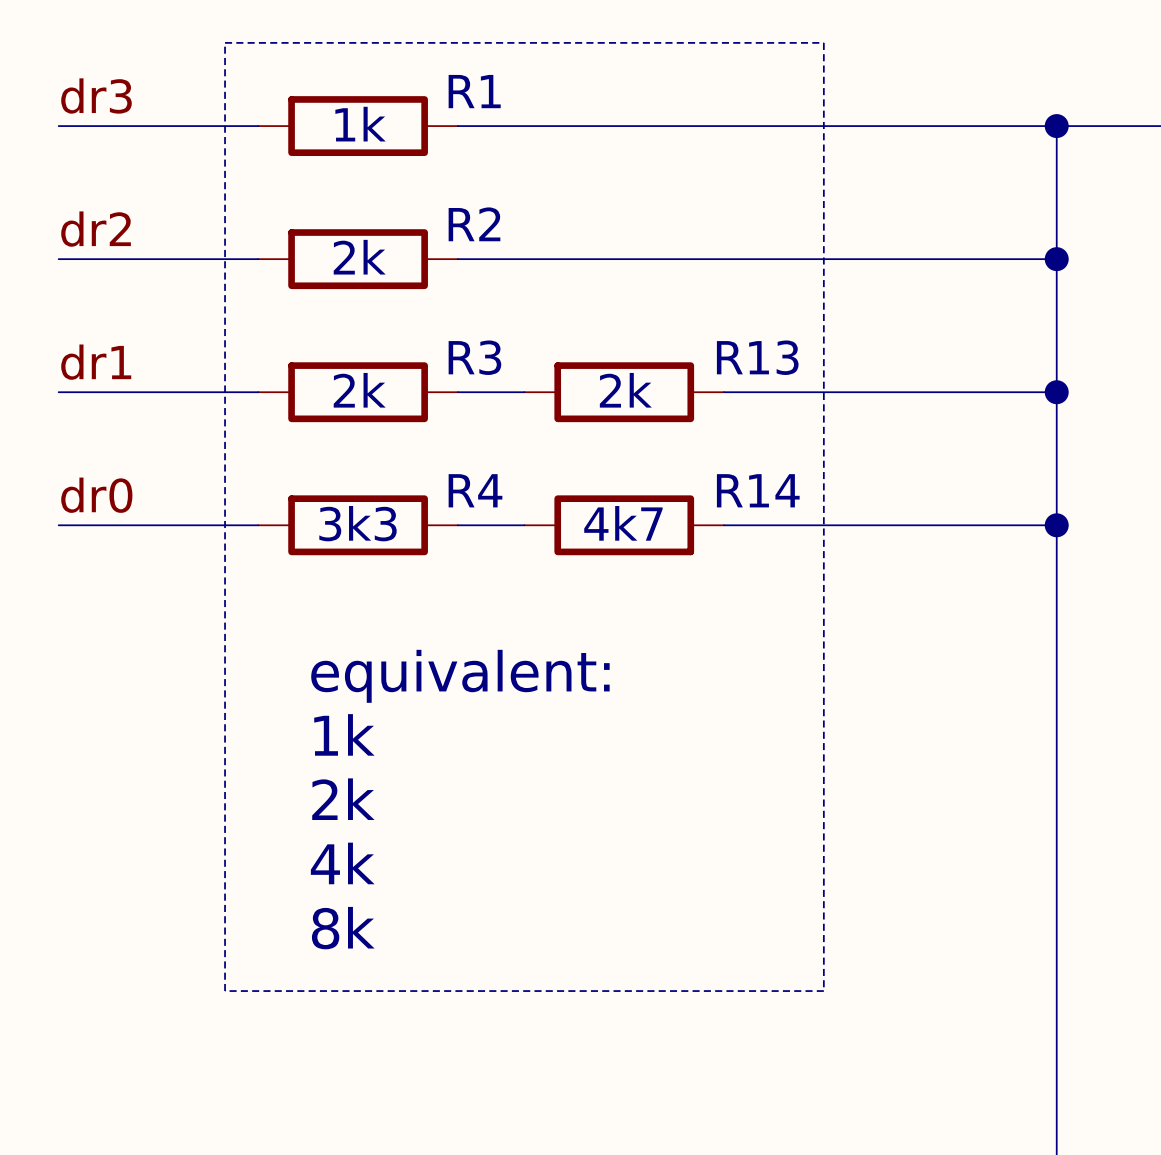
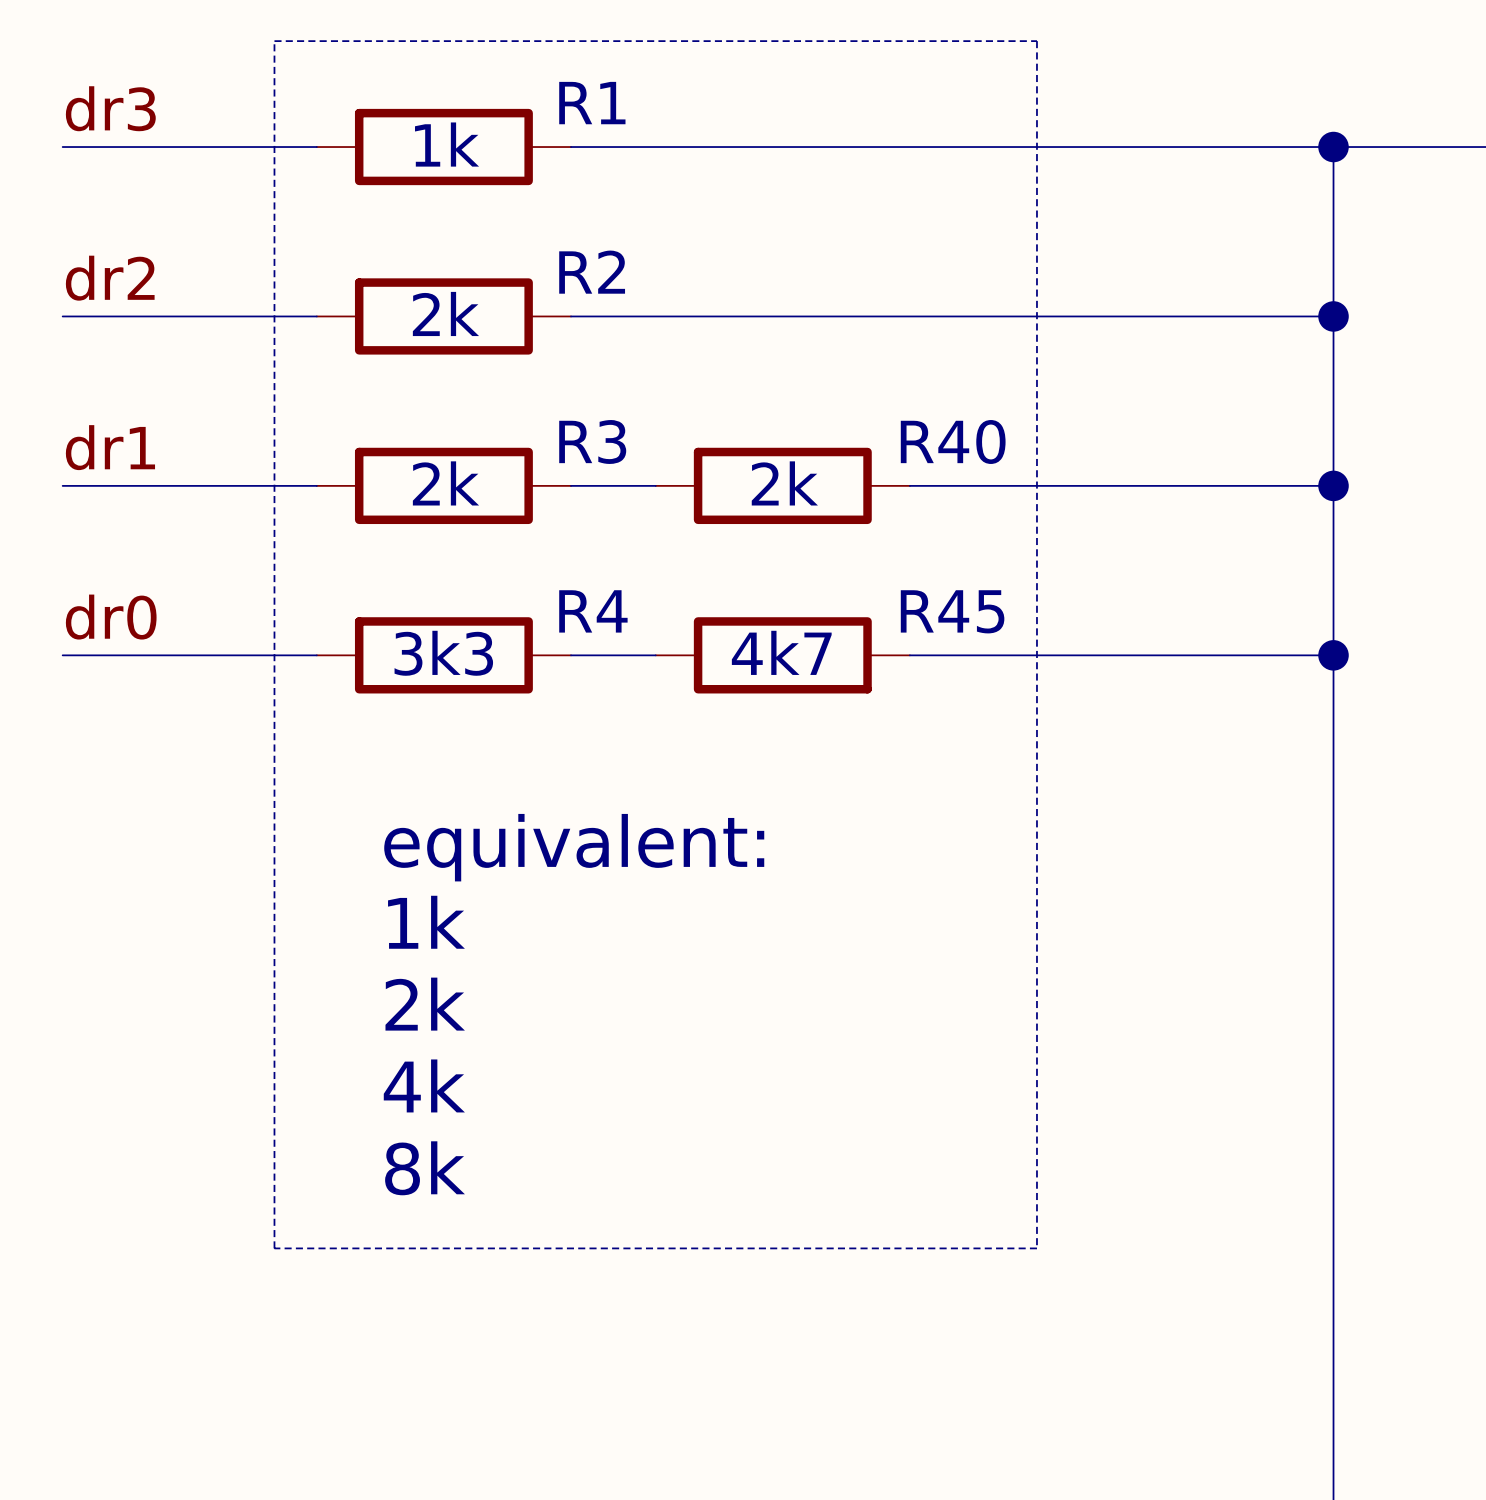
R13 name: R13 (757, 357) -> R40 (953, 441)
R14 name: R14 (758, 490) -> R45 (952, 611)

